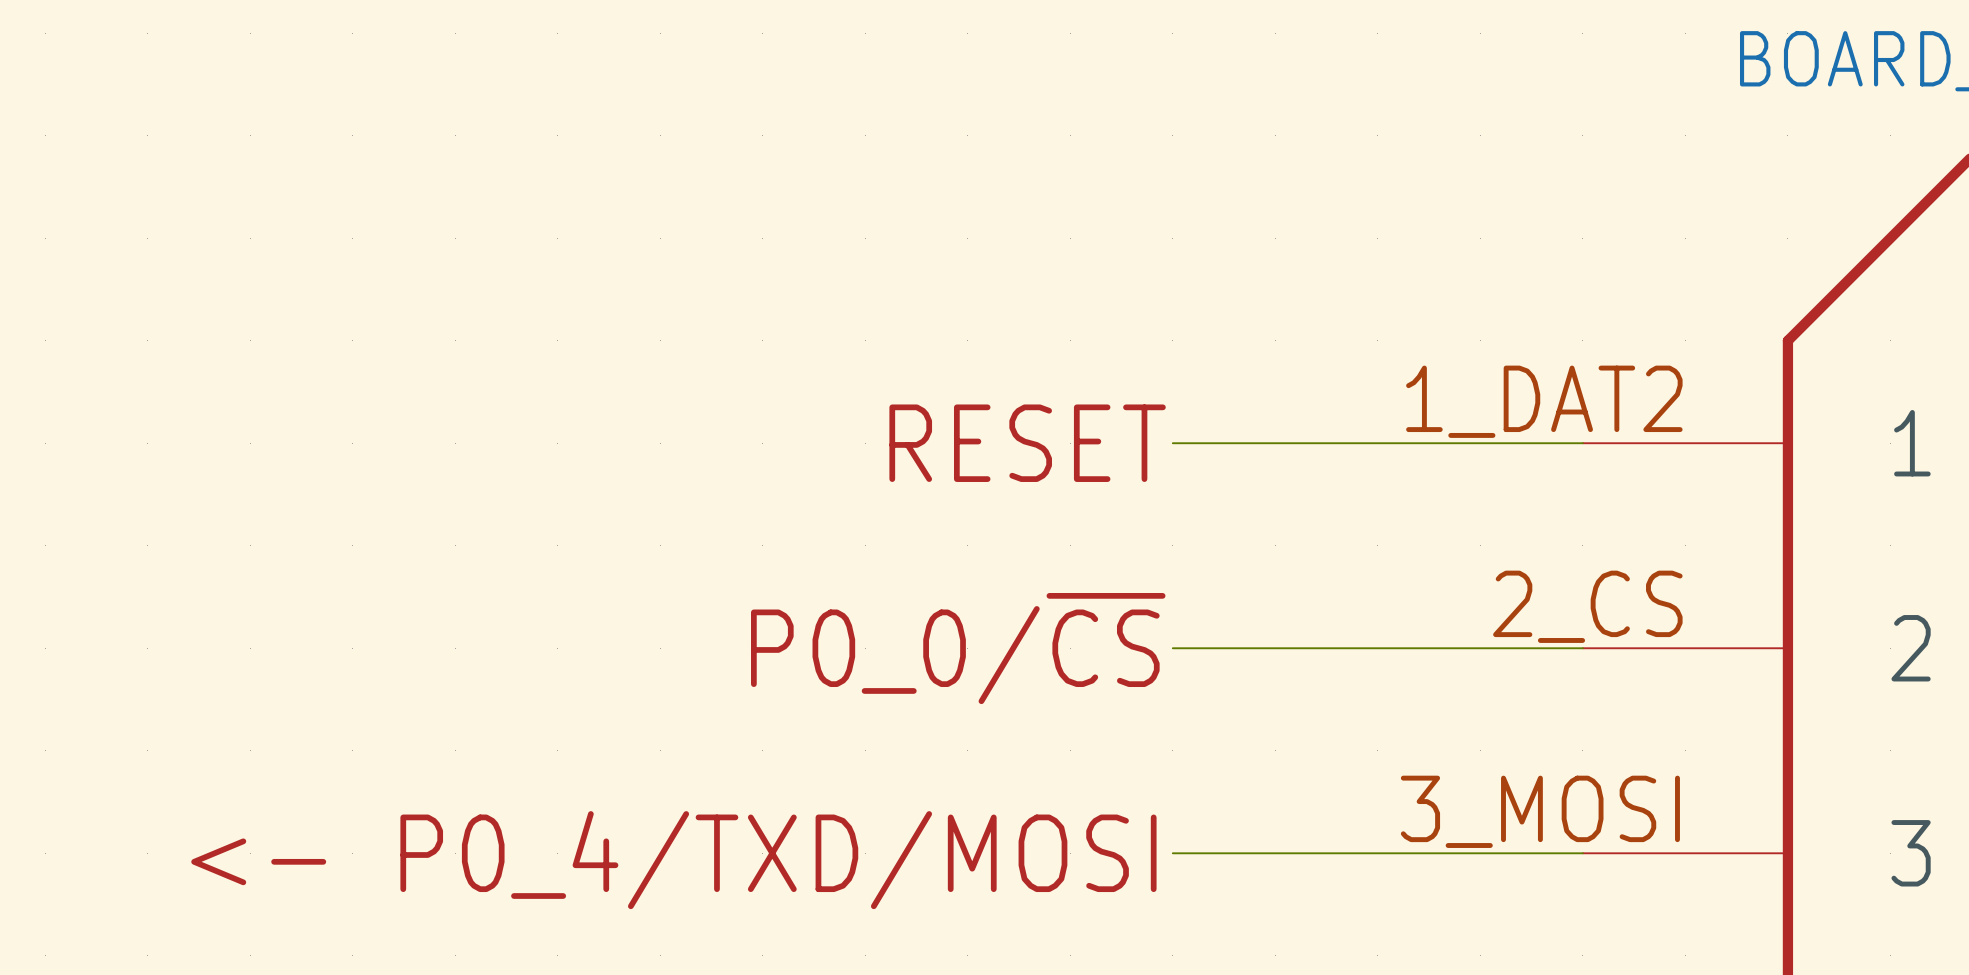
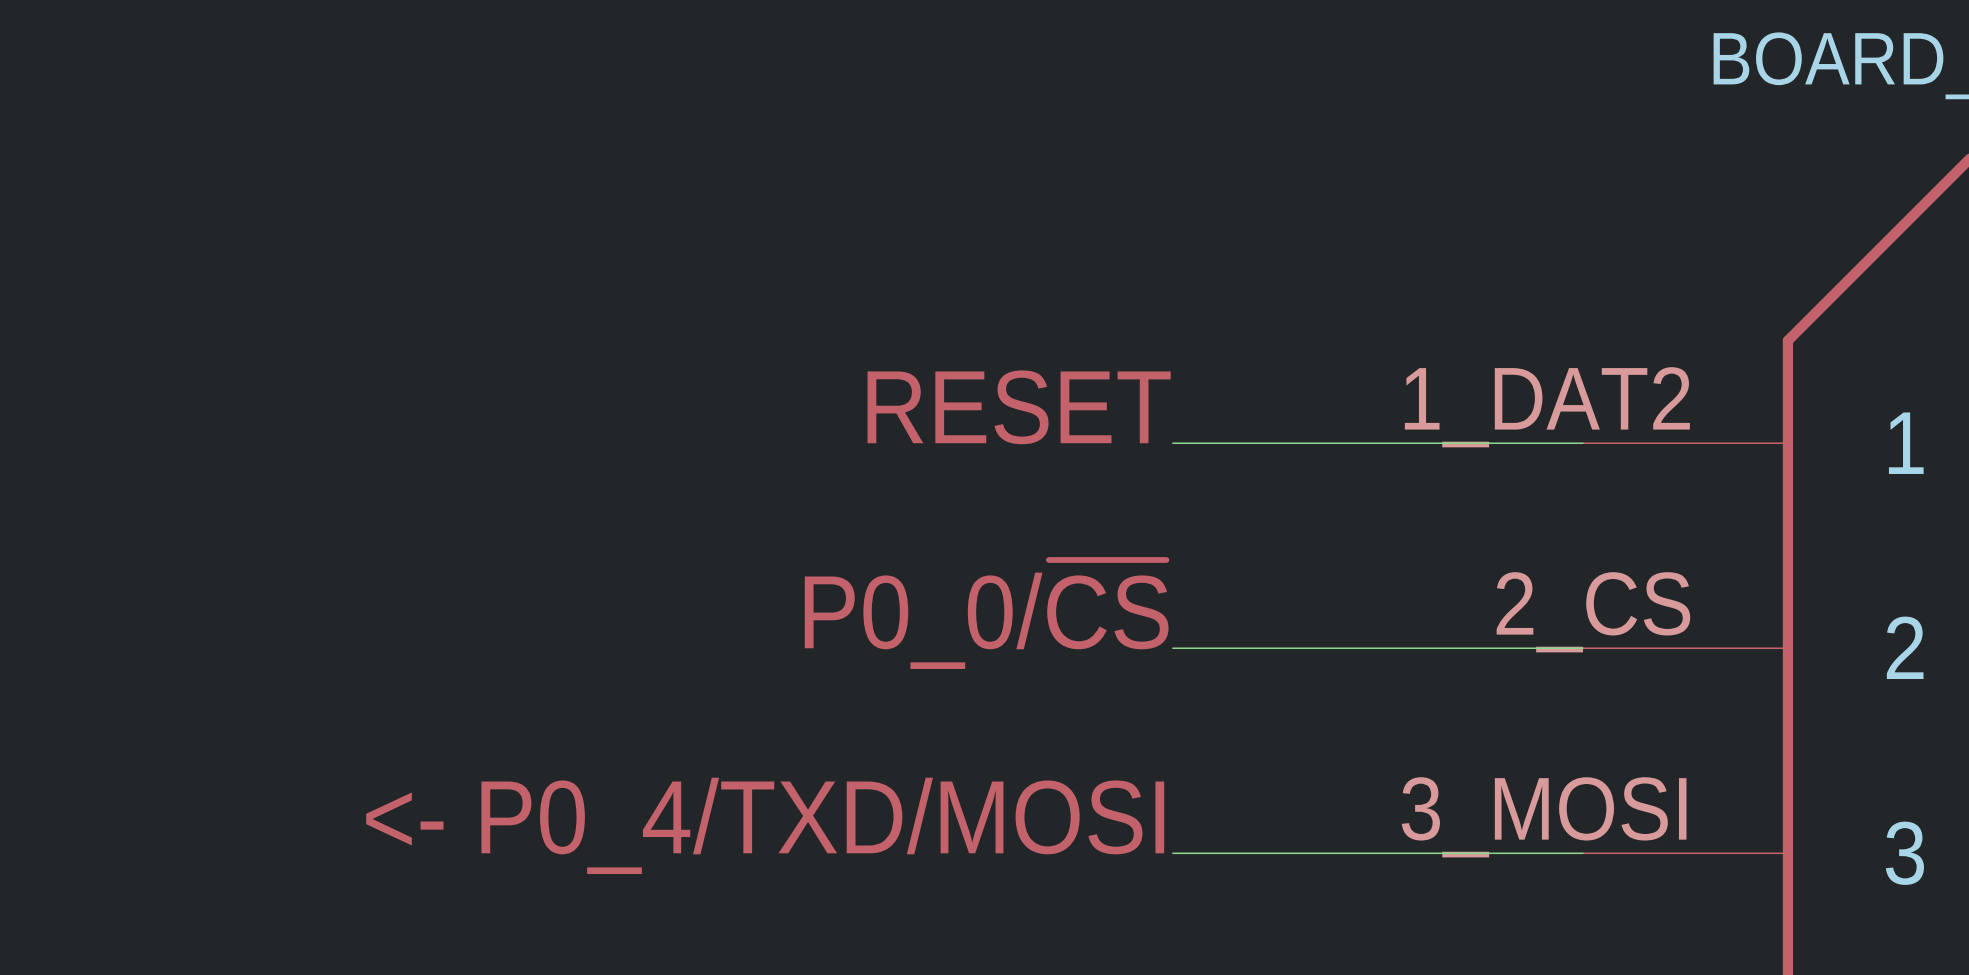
text position: RESET (1027, 443) -> RESET (1019, 407)
text position: P0_0/~{CS} (958, 648) -> P0_0/~{CS} (986, 614)
text position: <- P0_4/TXD/MOSI (673, 860) -> <- P0_4/TXD/MOSI (765, 825)

